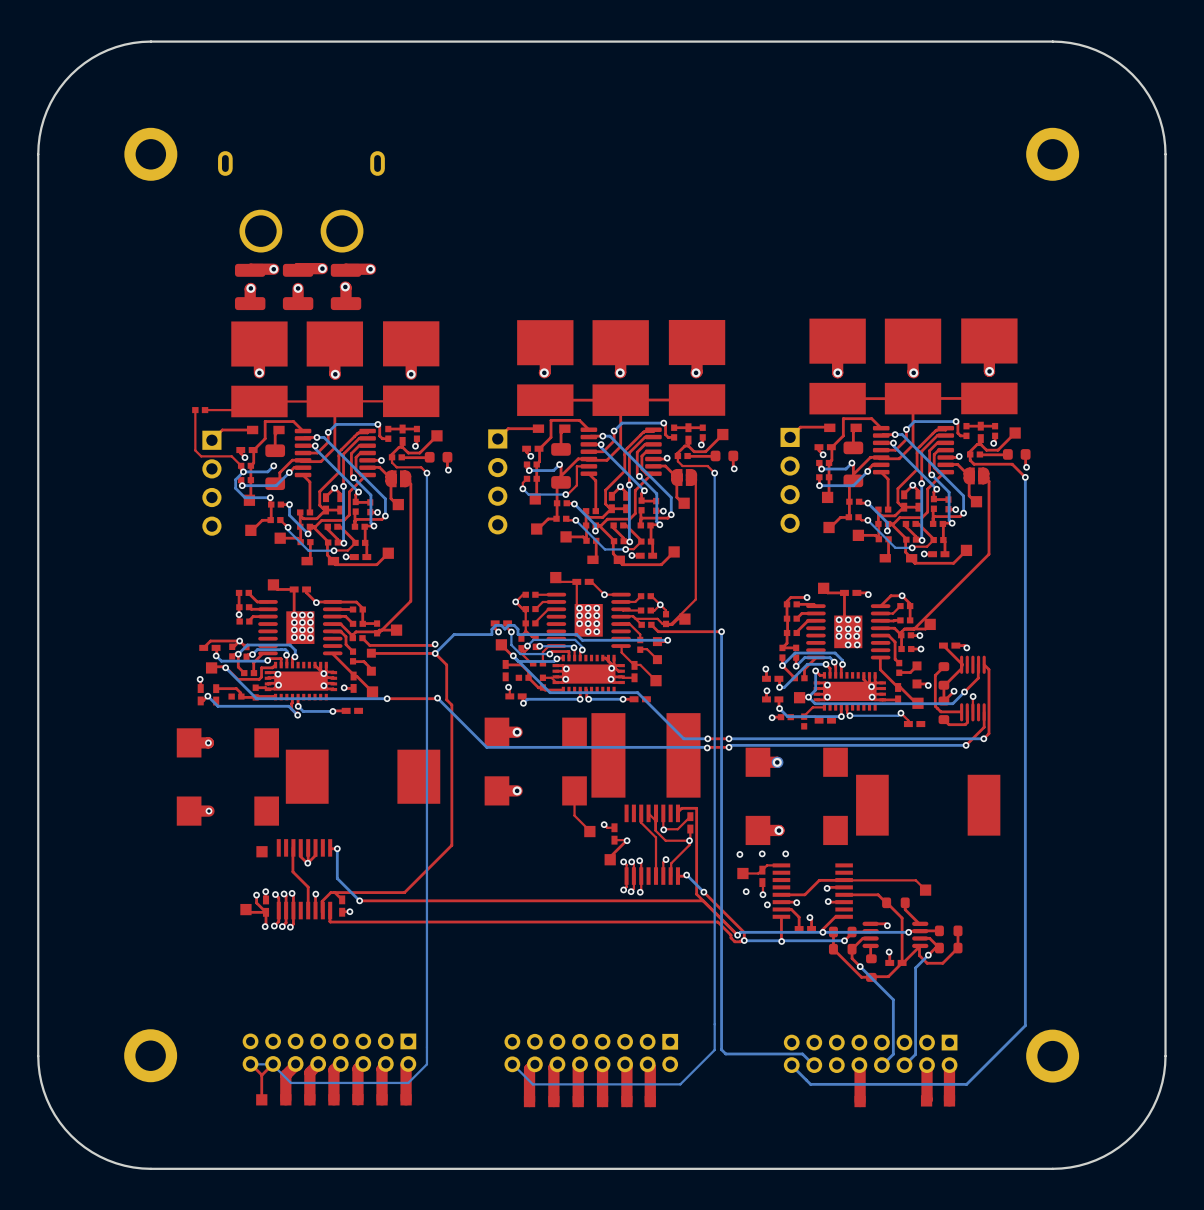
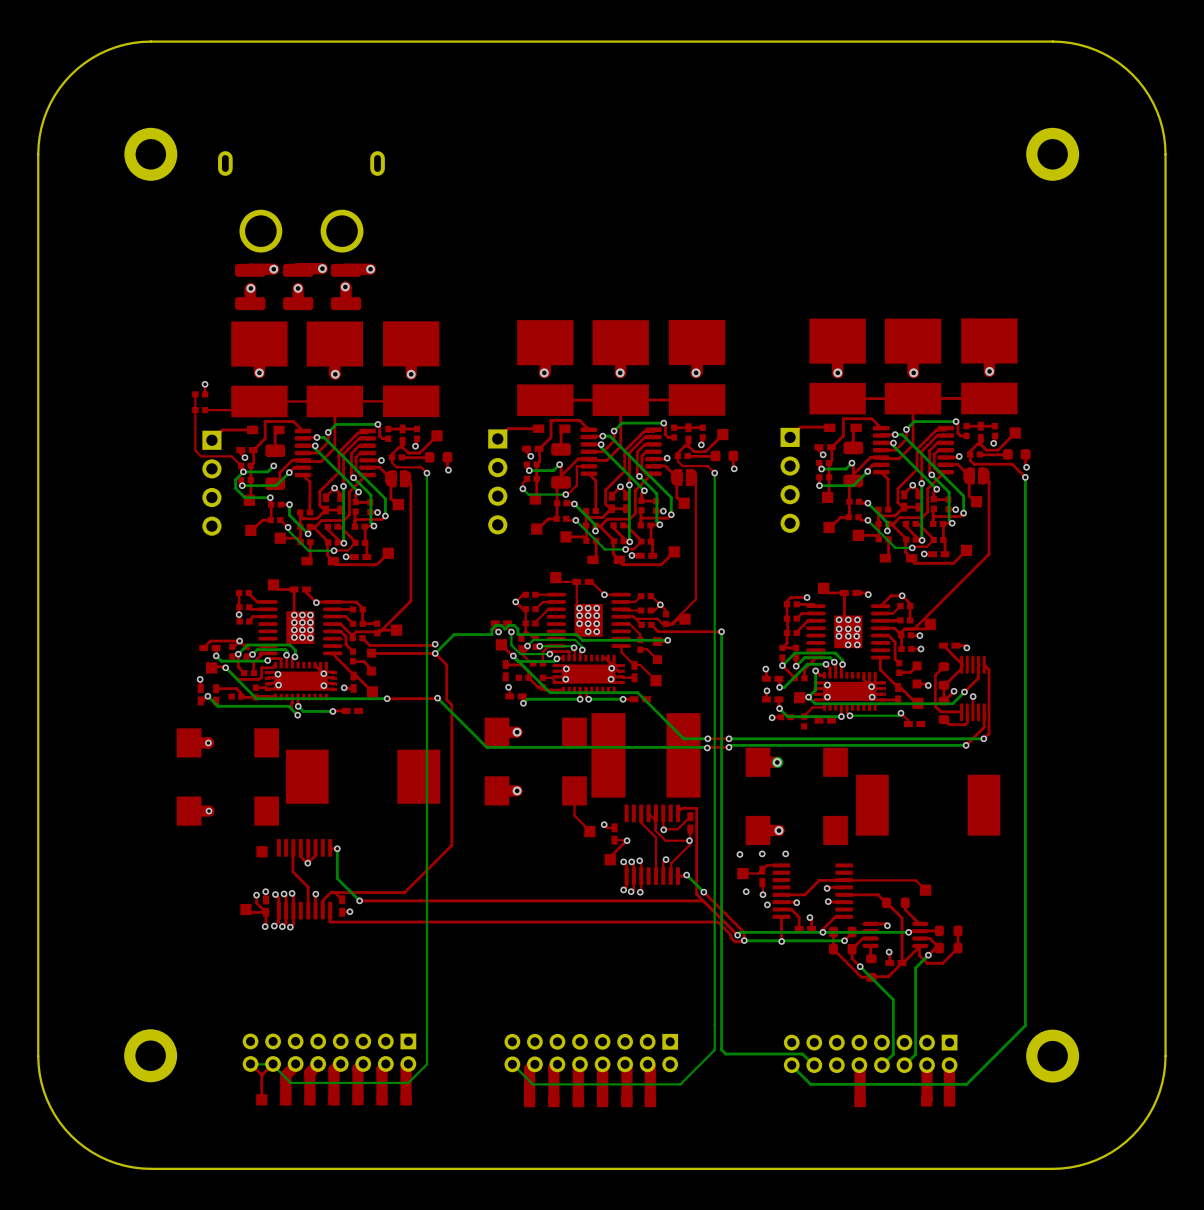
top track: none -> (205, 384) (205, 394)
via: none -> (205, 384)
top track: none -> (195, 394) (195, 410)
part: none -> (200, 394)

